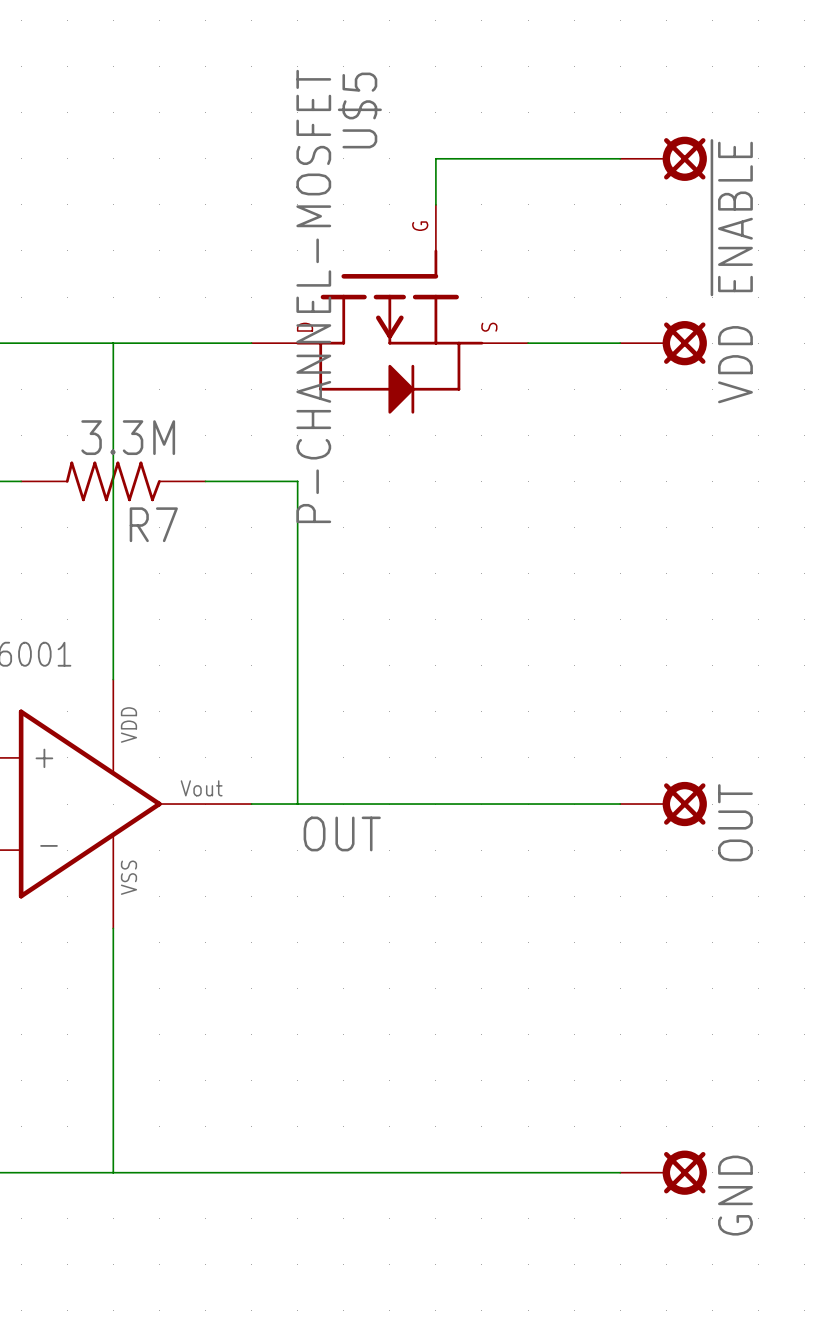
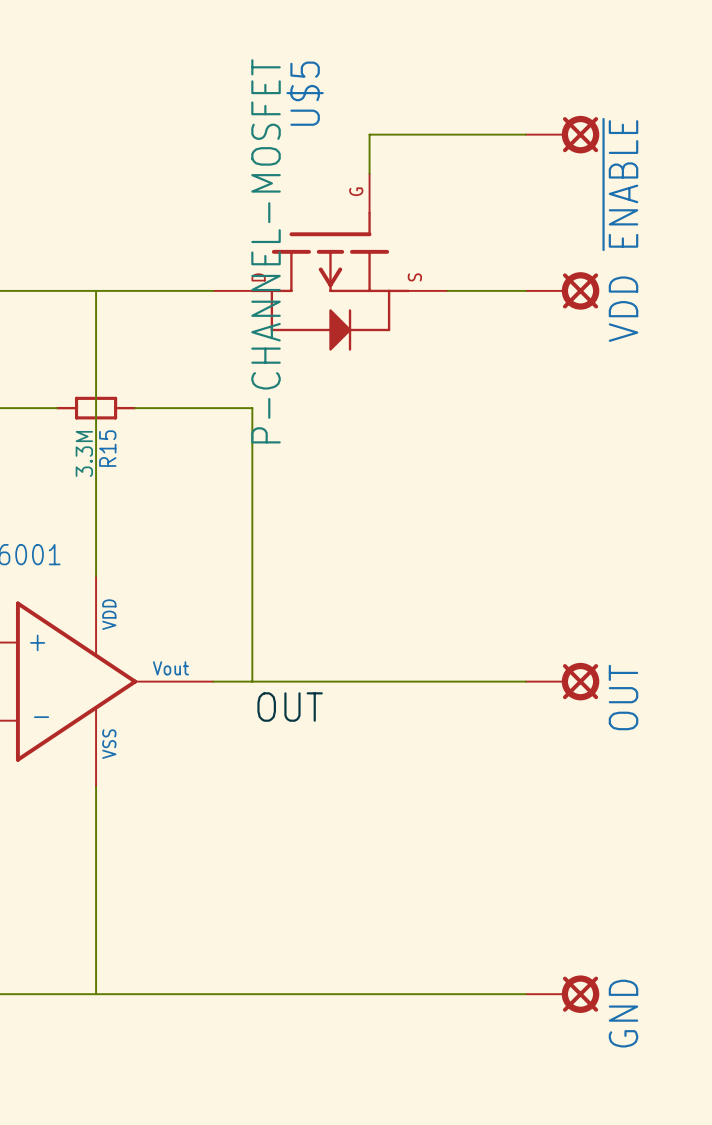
R7: 3.3M (113, 481) -> none
R15: none -> 3.3M (96, 408)

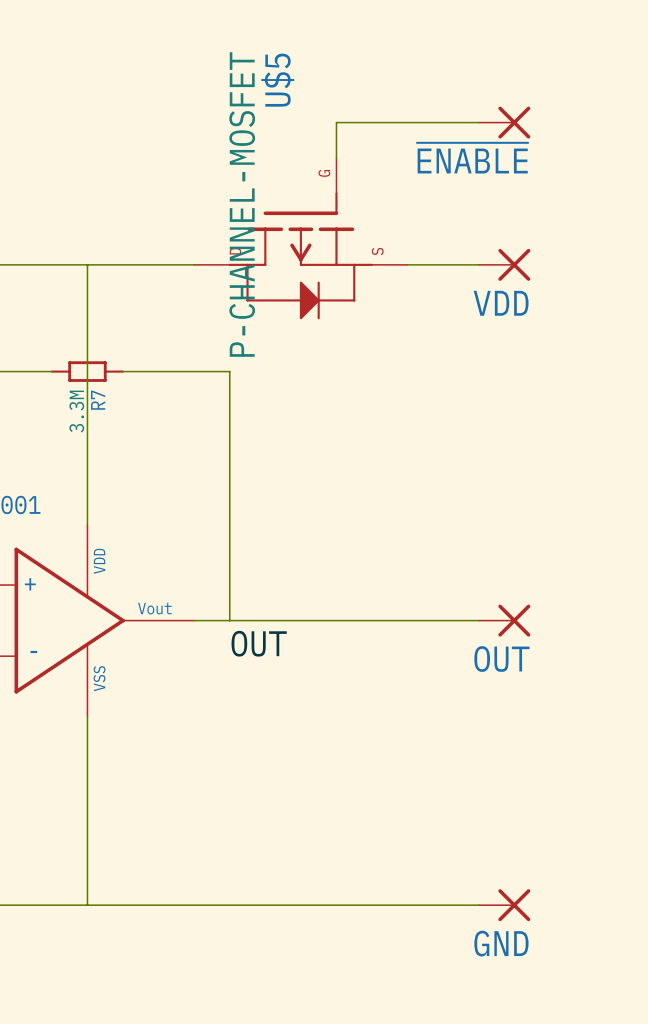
~{ENABLE} symbol: [525, 115, 600, 154] -> [478, 106, 531, 139]
~{ENABLE} name position: ~{ENABLE} (620, 184) -> ~{ENABLE} (472, 158)
VDD symbol: [525, 272, 600, 310] -> [478, 248, 531, 281]
VDD name position: VDD (623, 309) -> VDD (501, 303)
R15 name: R15 (107, 448) -> R7 (98, 400)
OUT symbol: [525, 662, 600, 701] -> [478, 604, 531, 637]
OUT name position: OUT (623, 697) -> OUT (501, 659)
GND symbol: [525, 975, 600, 1013] -> [478, 889, 531, 922]
GND name position: GND (623, 1013) -> GND (501, 943)

